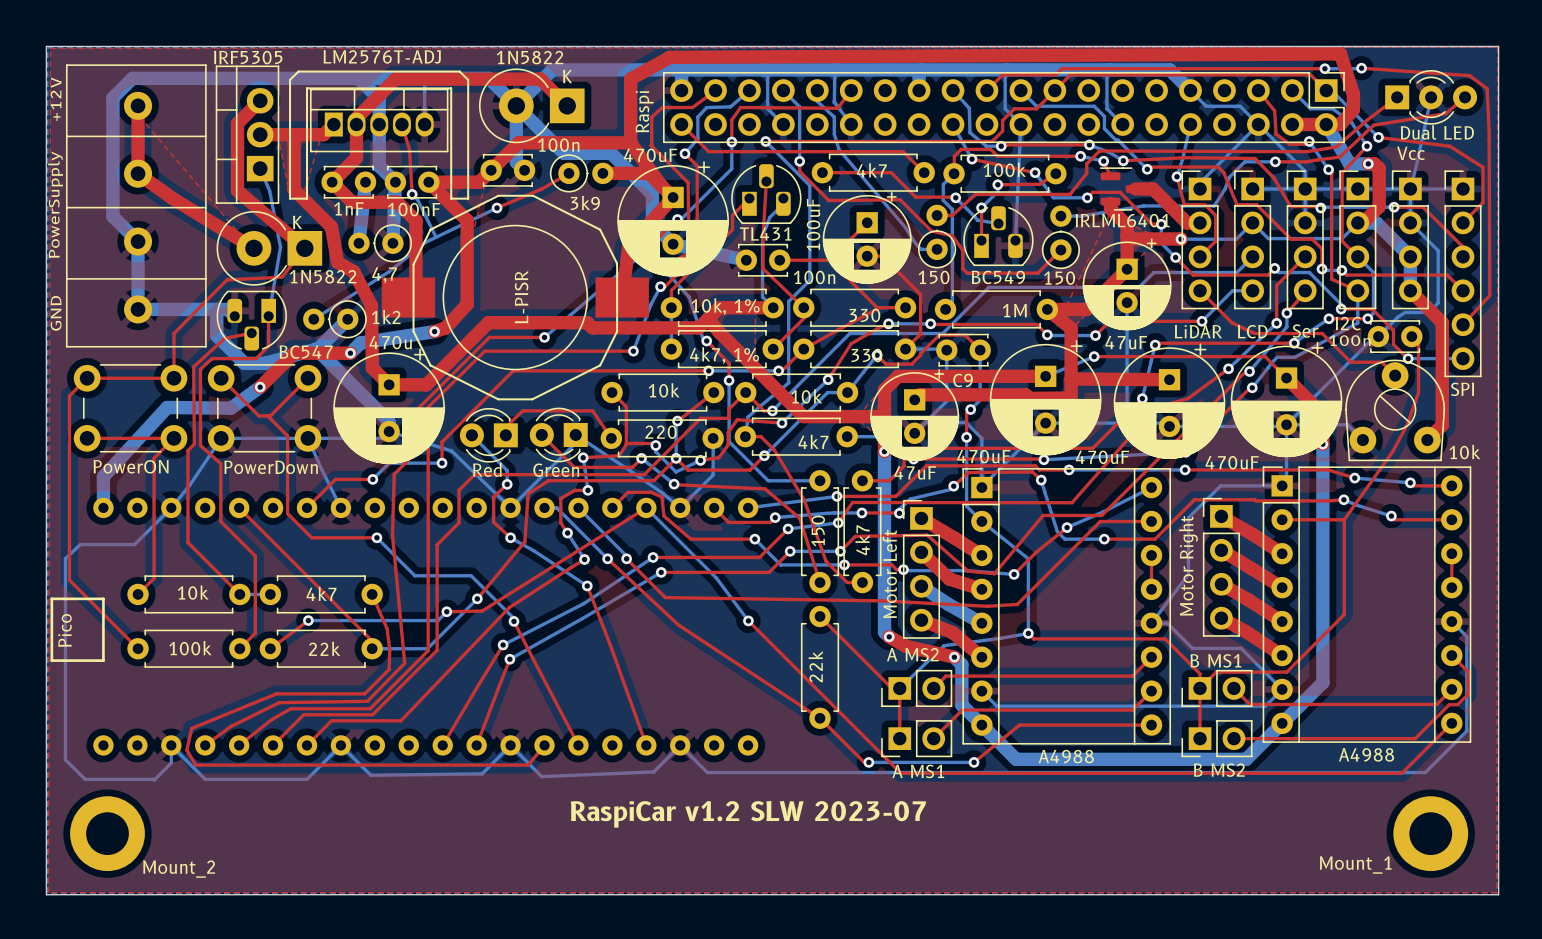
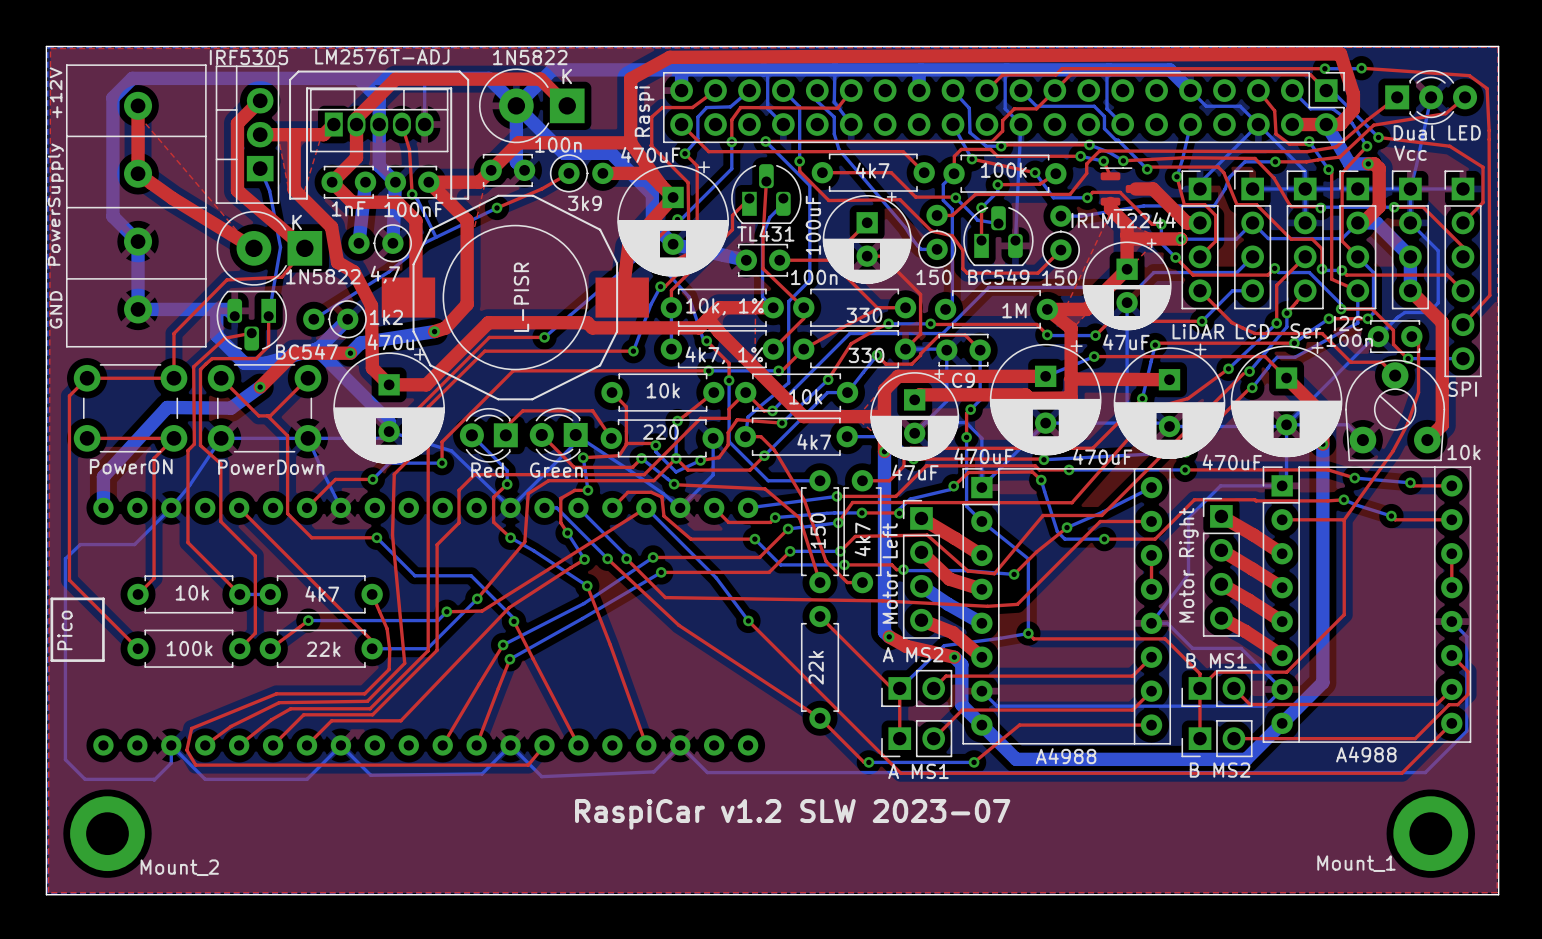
part value: IRLML6401 (1122, 220) -> IRLML2244 (1123, 220)

